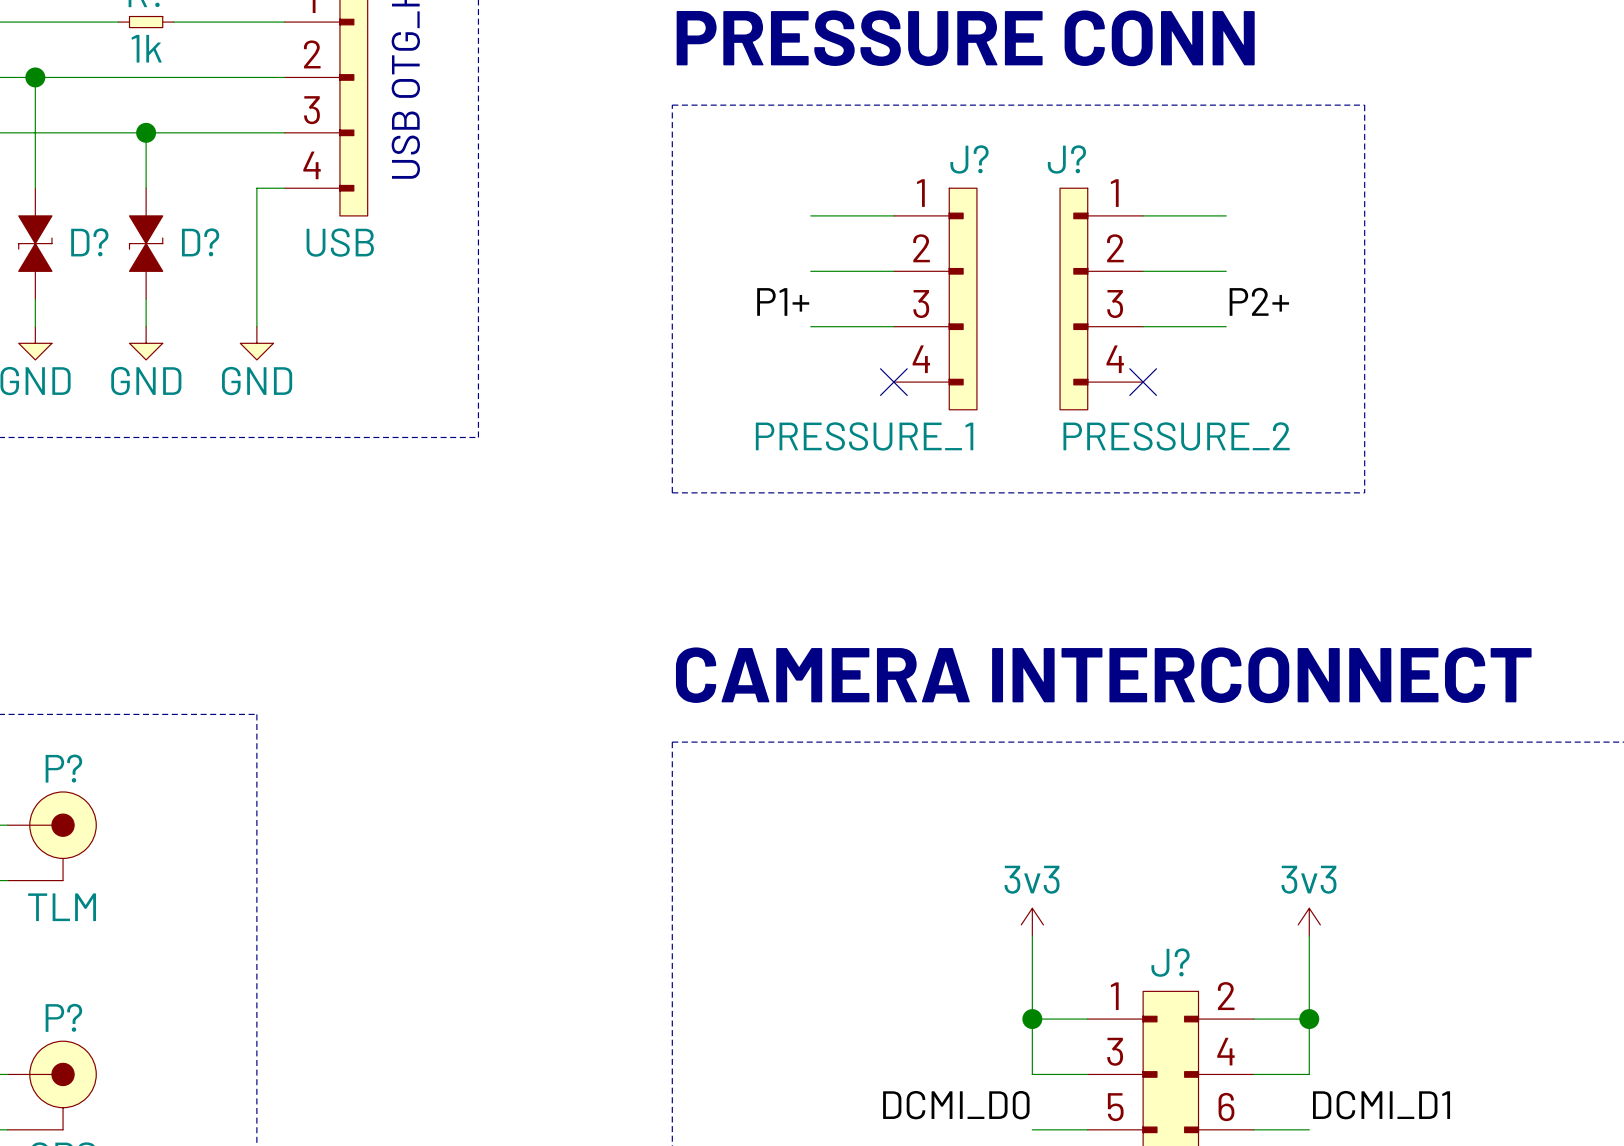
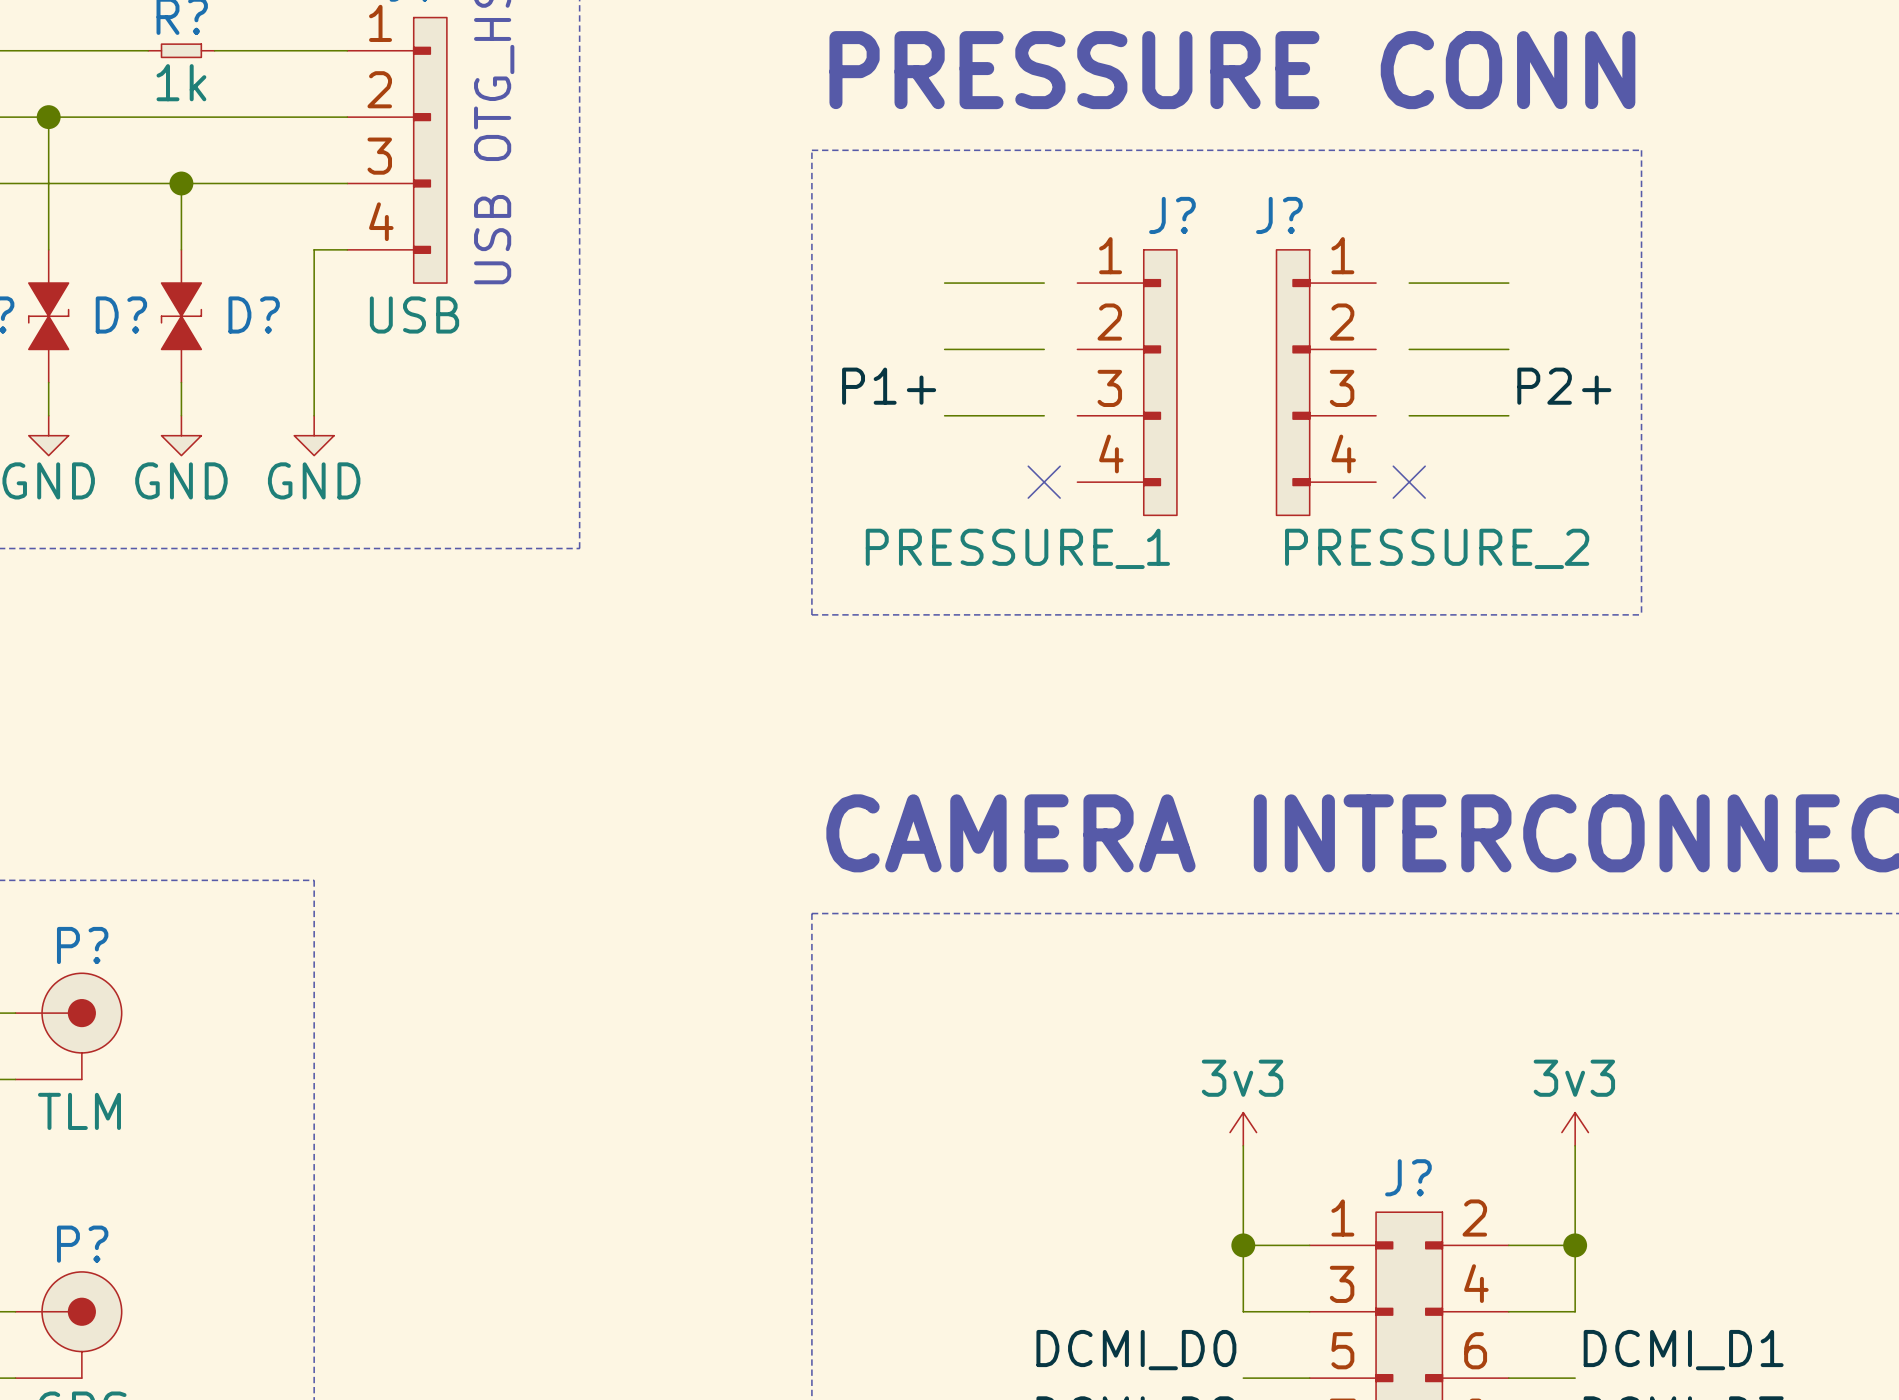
wire: (866, 215) (893, 215) -> (944, 283) (977, 283)
wire: (1143, 215) (1170, 215) -> (1475, 283) (1508, 283)
wire: (866, 271) (893, 271) -> (944, 349) (977, 349)
wire: (1143, 271) (1170, 271) -> (1475, 349) (1508, 349)
label position: P1+ (783, 301) -> P1+ (889, 386)
label position: P2+ (1259, 301) -> P2+ (1564, 386)
wire: (866, 326) (893, 326) -> (944, 415) (977, 415)
wire: (1143, 326) (1170, 326) -> (1475, 415) (1508, 415)
no-connect mark position: (893, 382) -> (1044, 482)
no-connect mark position: (1143, 382) -> (1409, 482)

